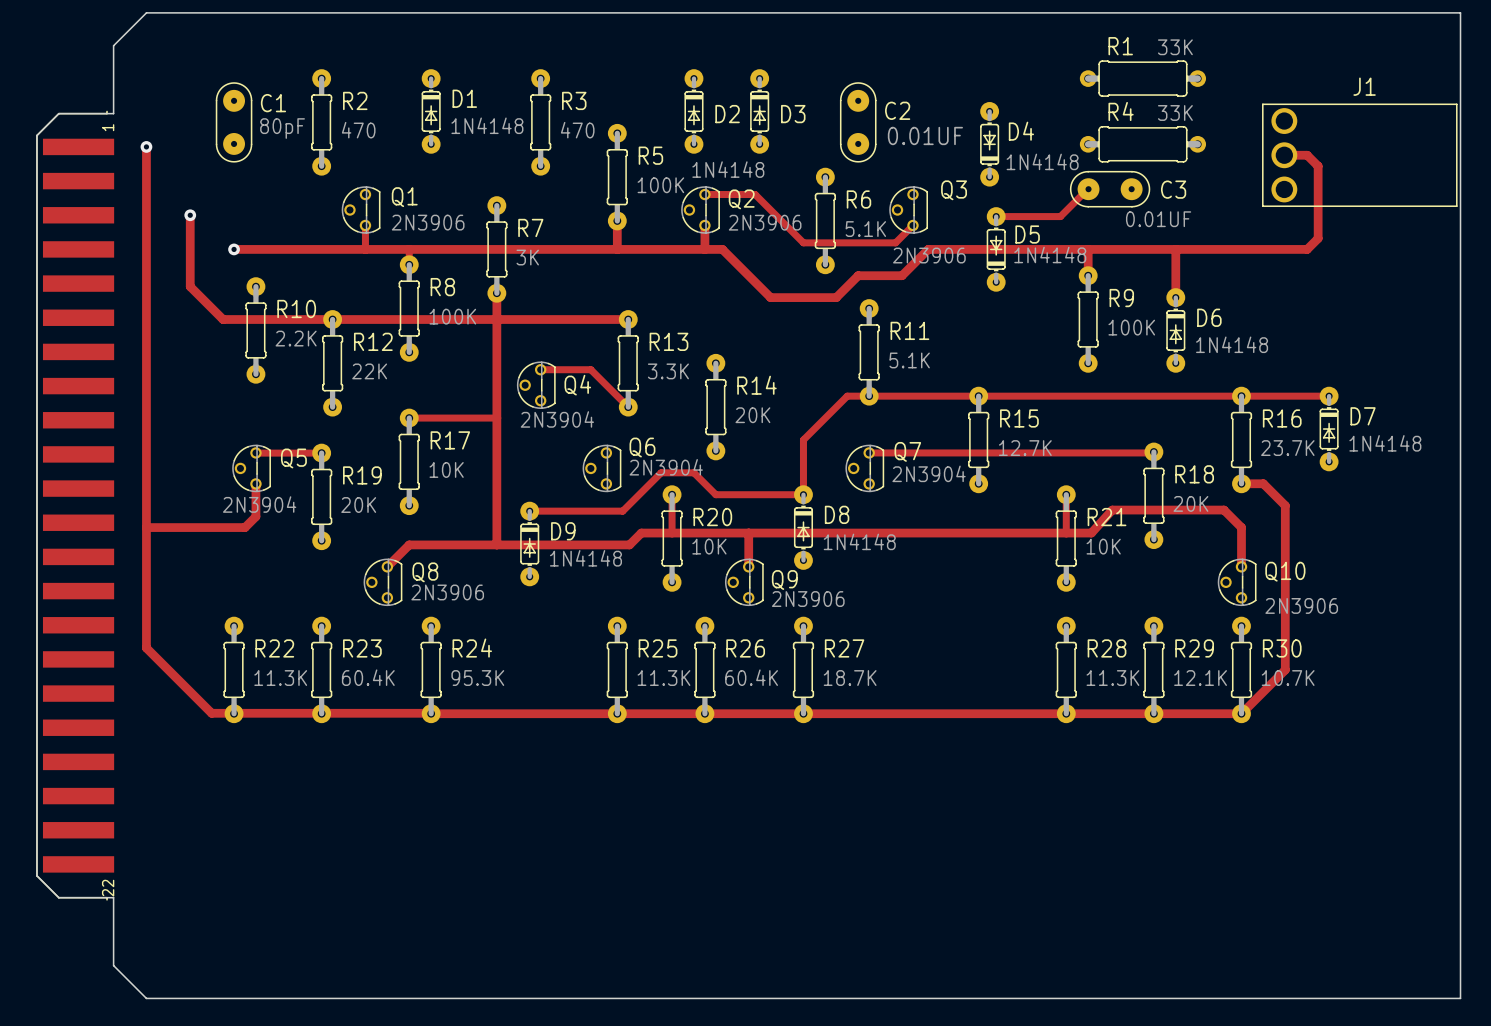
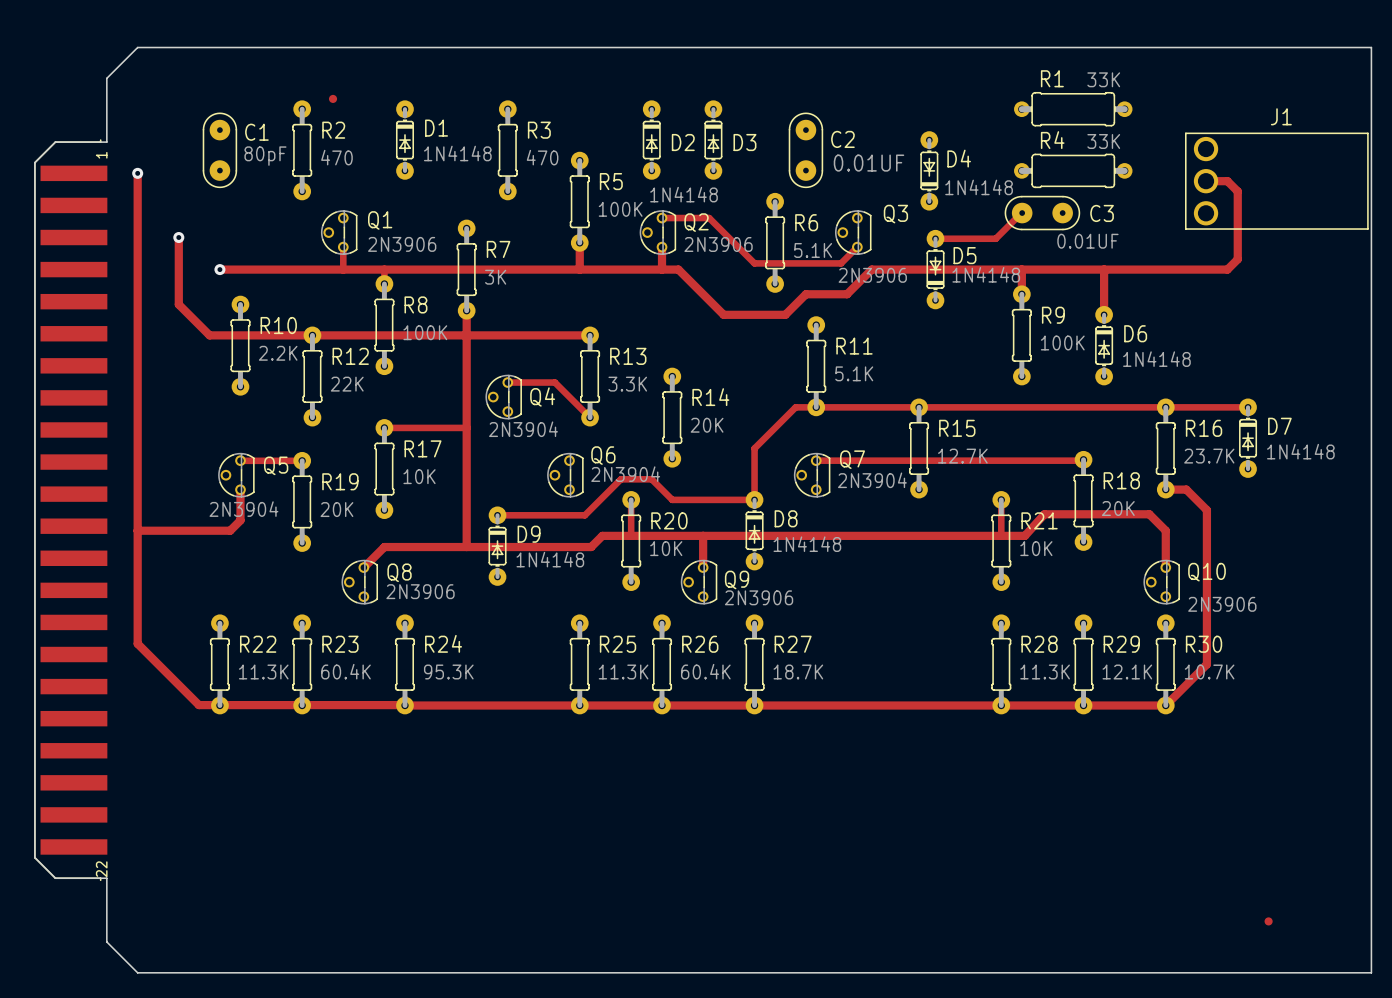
part: none -> (333, 98)
part: none -> (1268, 921)

